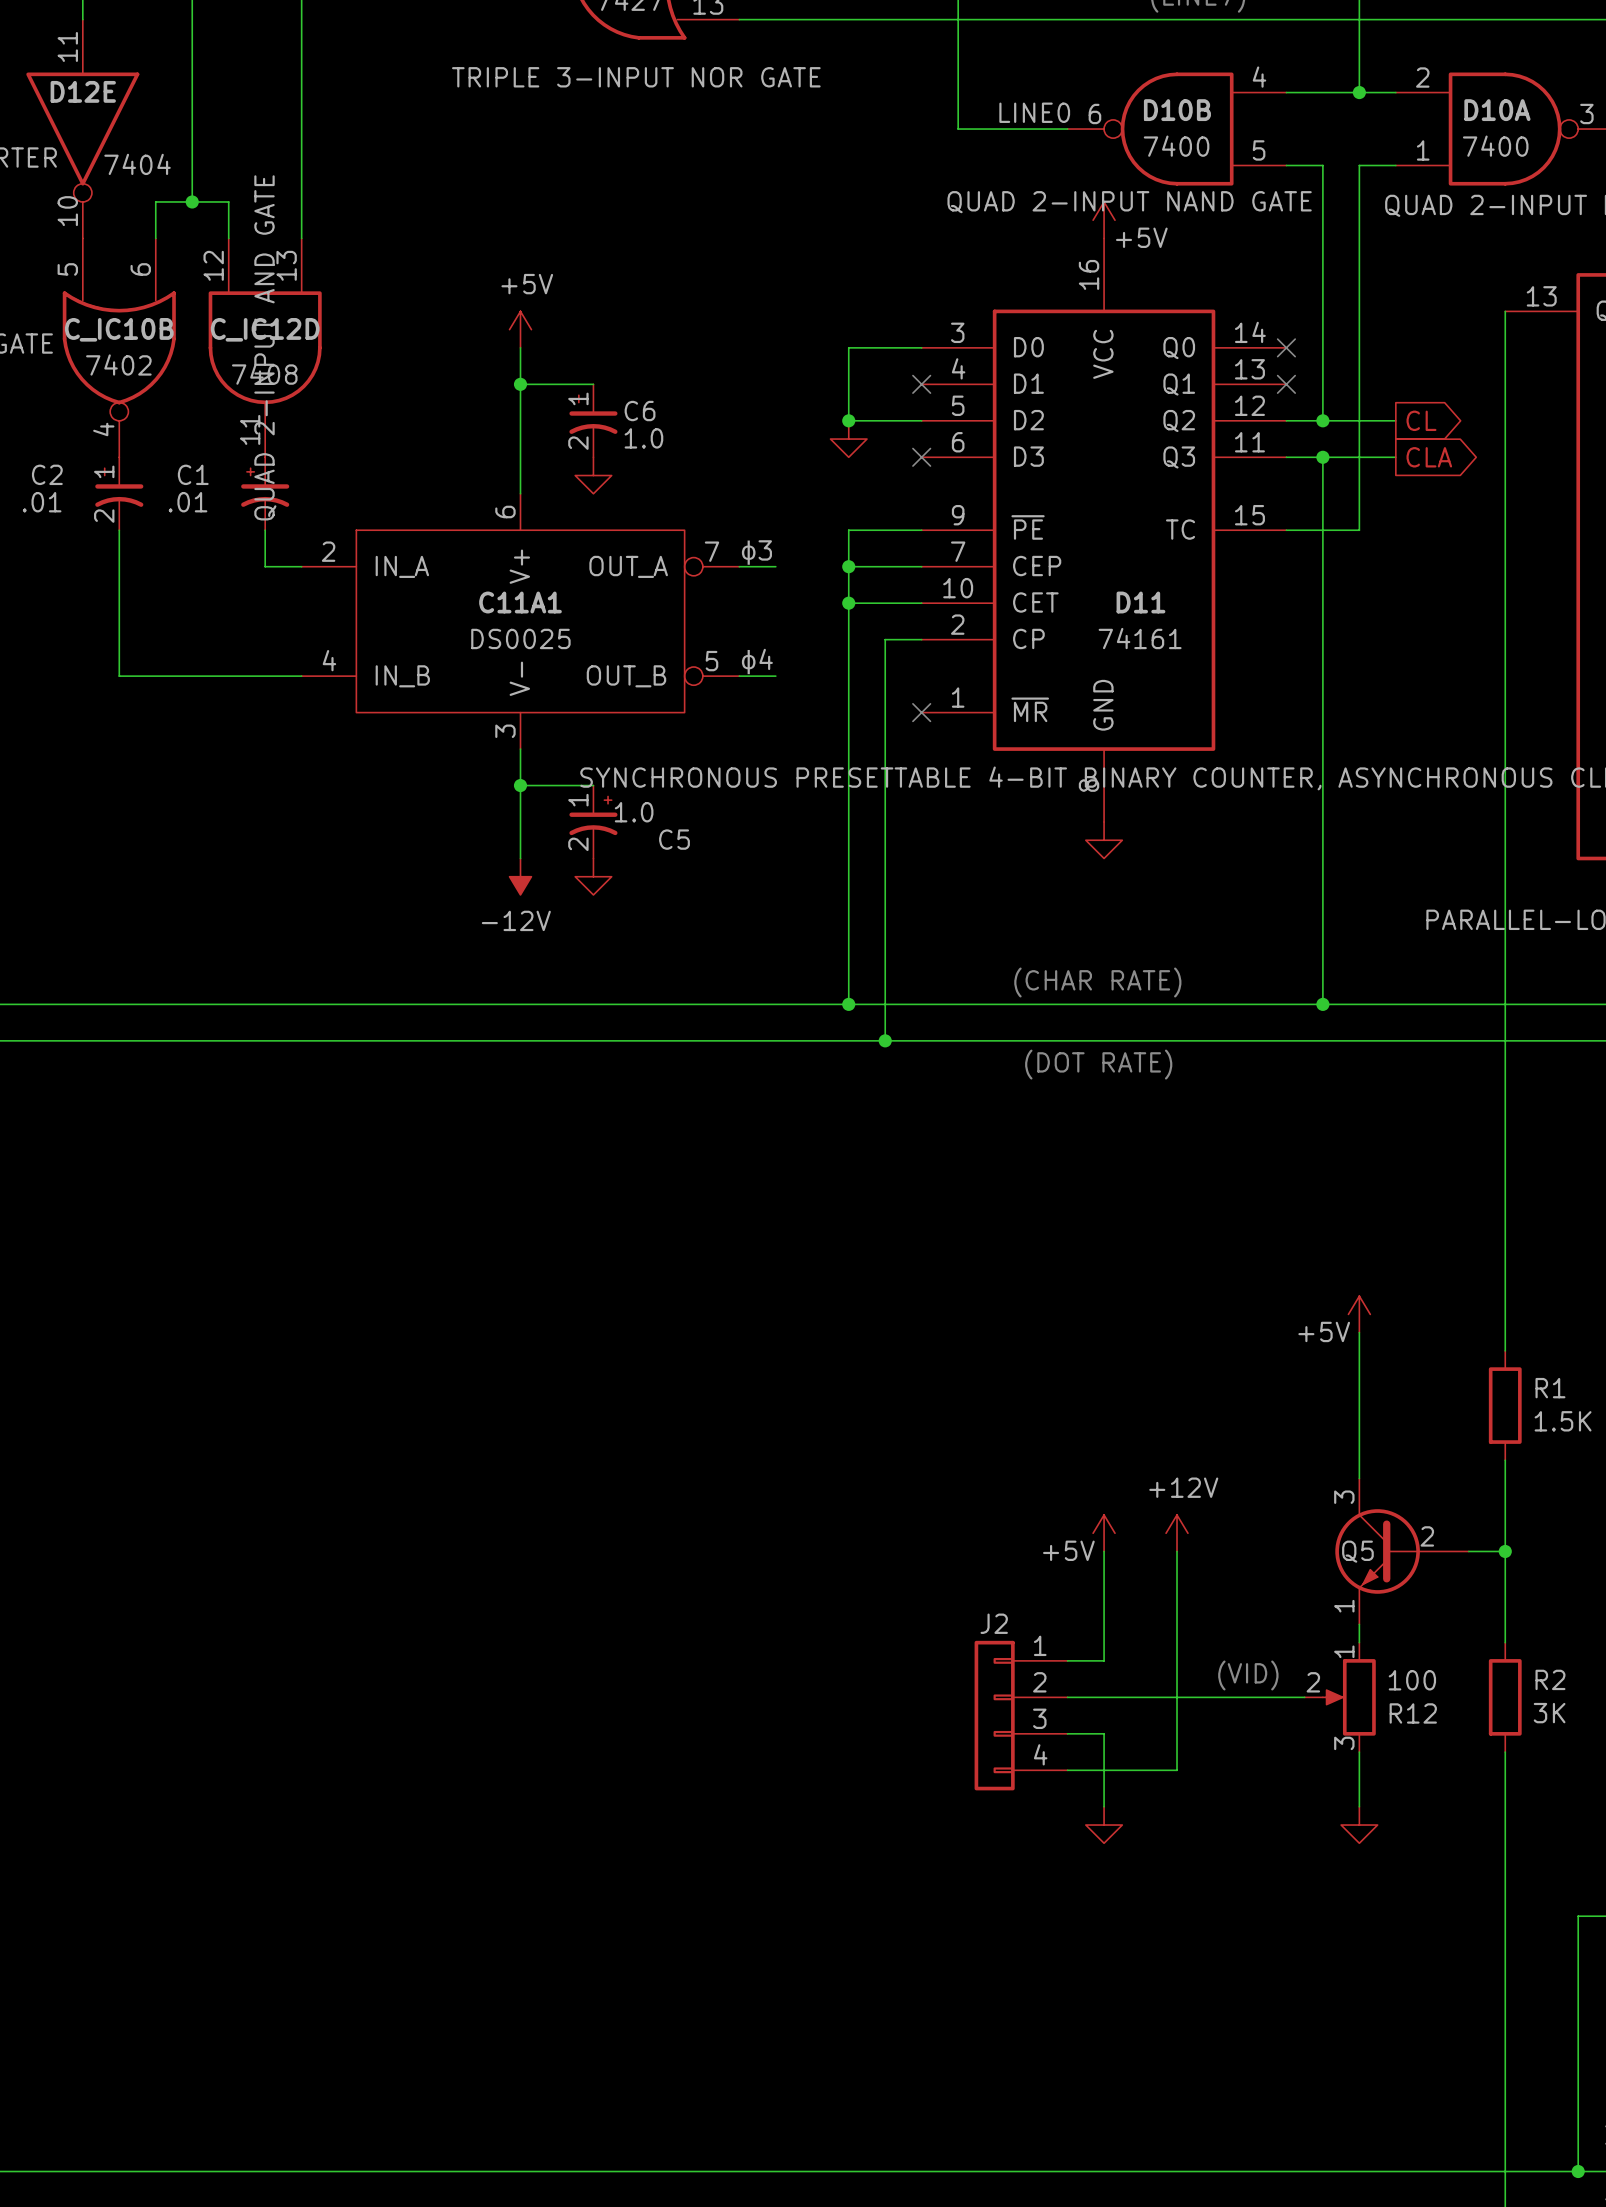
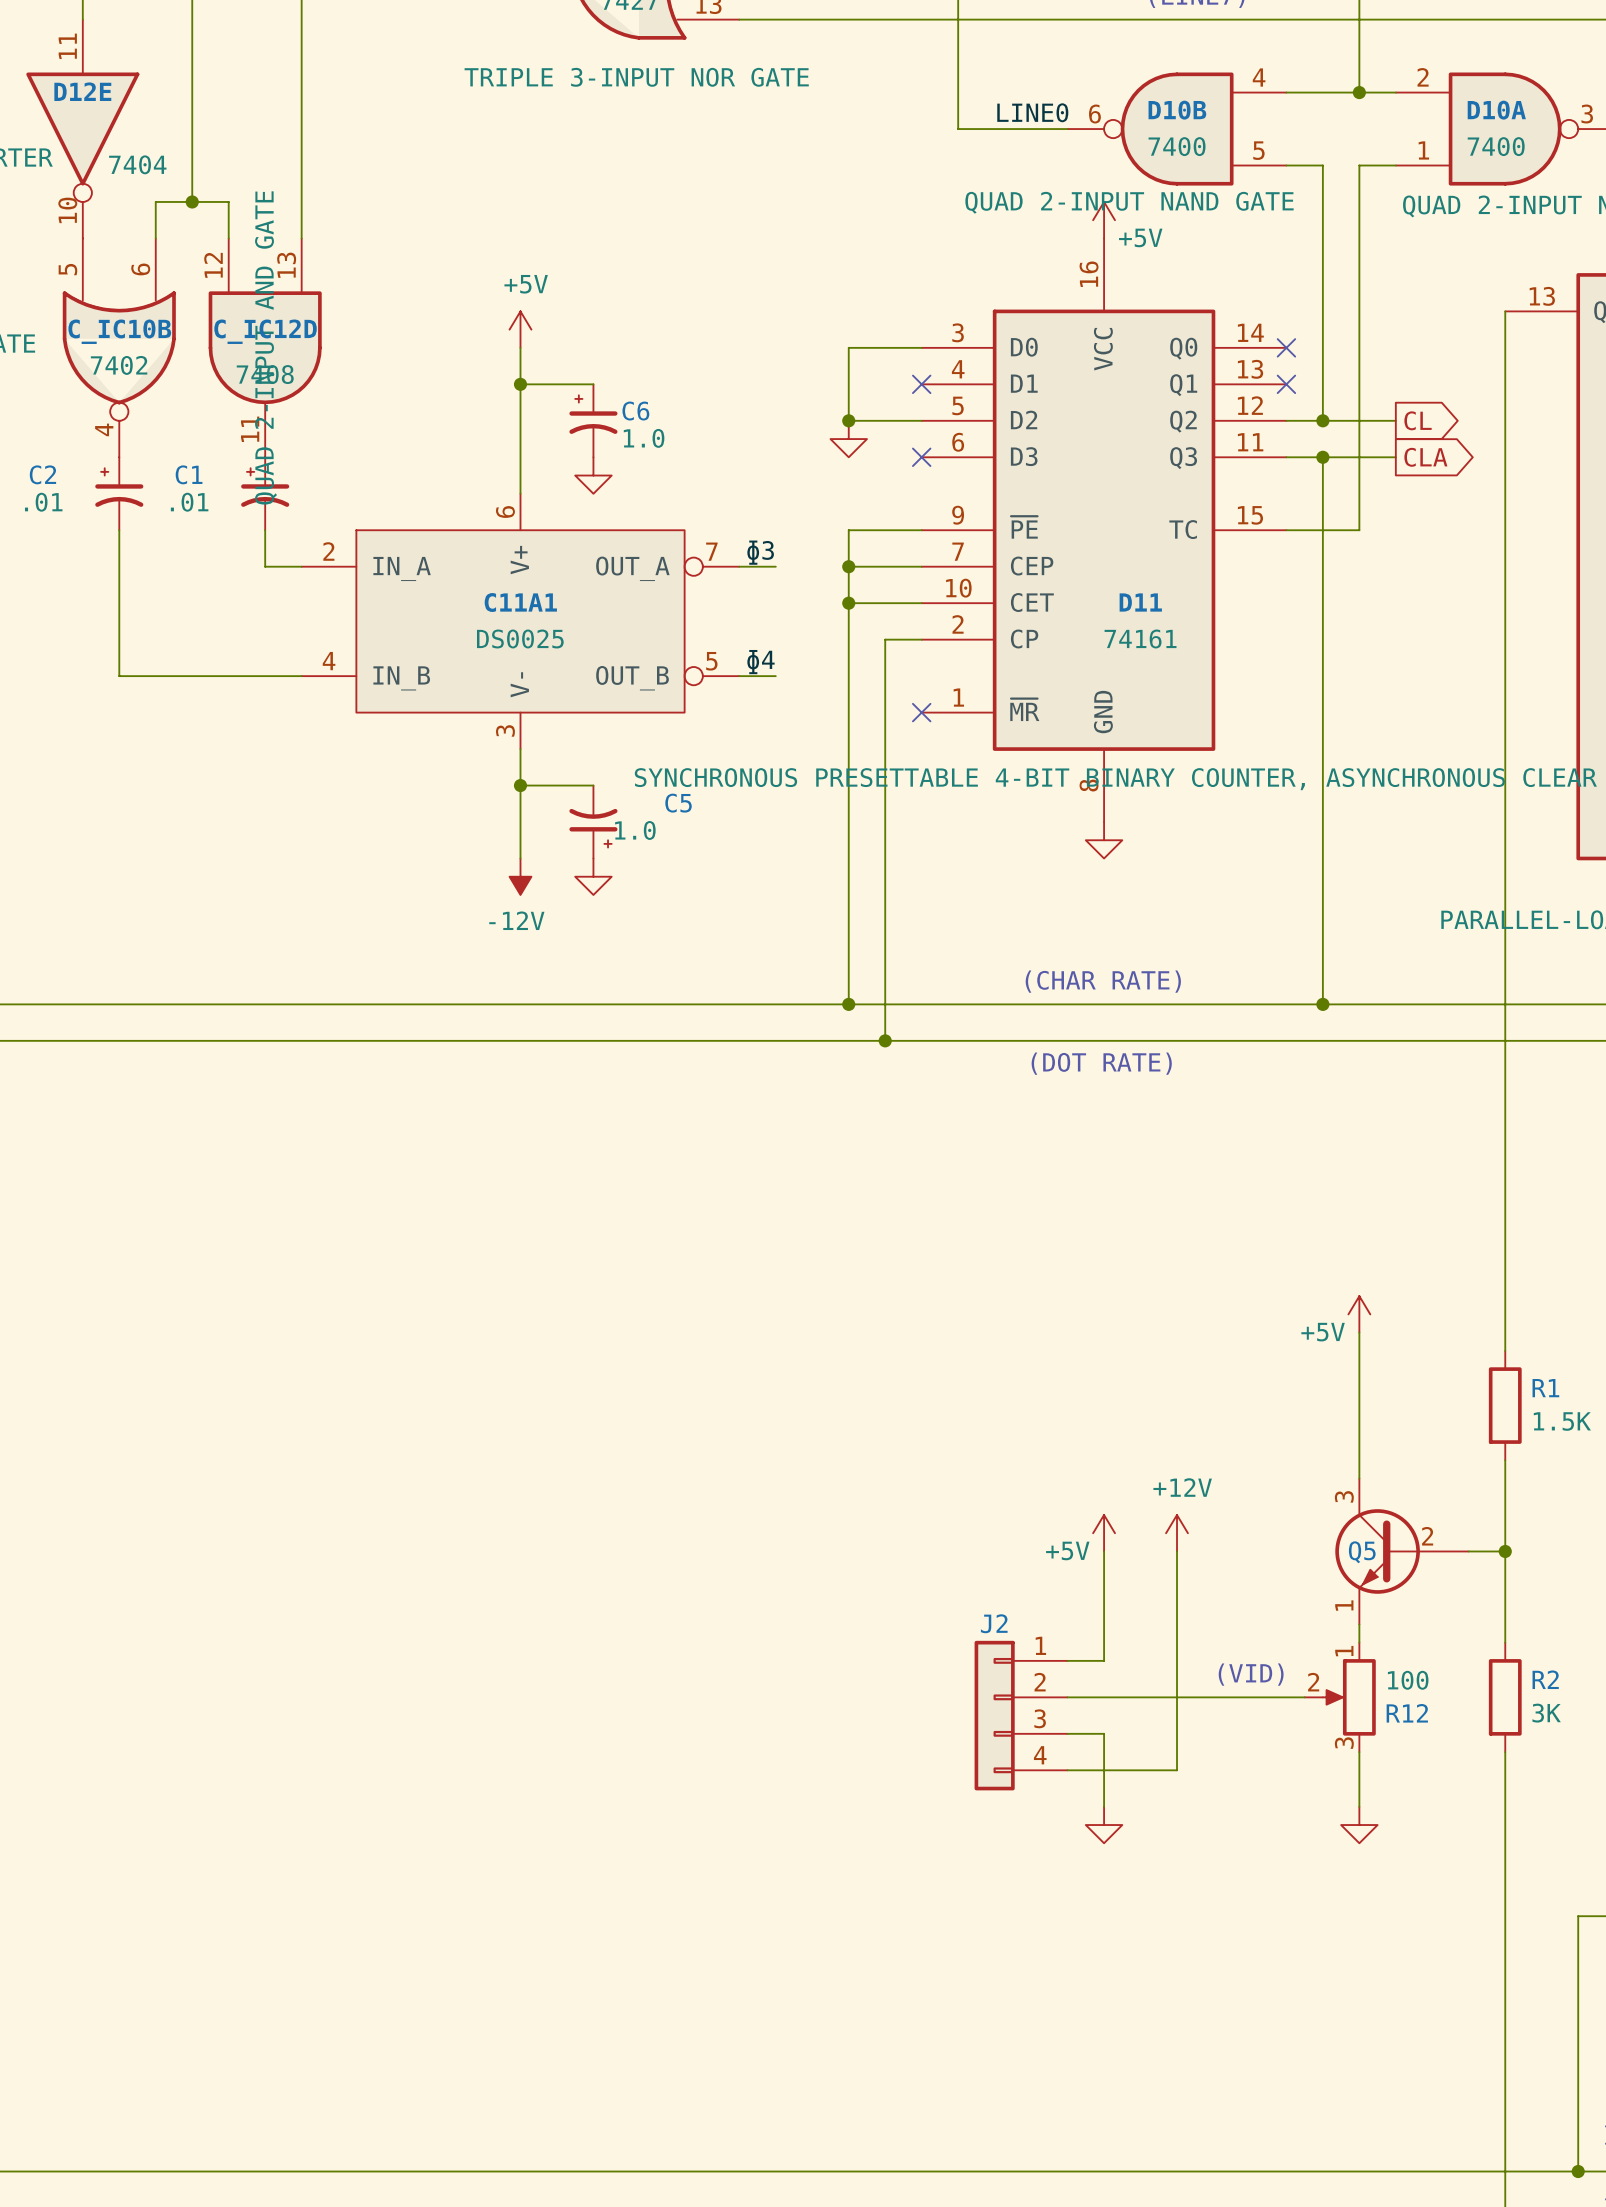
C6 pin number: 1 (578, 398) -> none
C6 pin number: 2 (578, 443) -> none
C2 pin number: 1 (104, 471) -> none
C2 pin number: 2 (104, 516) -> none
C5 symbol: [569, 785, 618, 859] -> [569, 785, 618, 859]
C5 name position: C5 (674, 839) -> C5 (678, 803)

